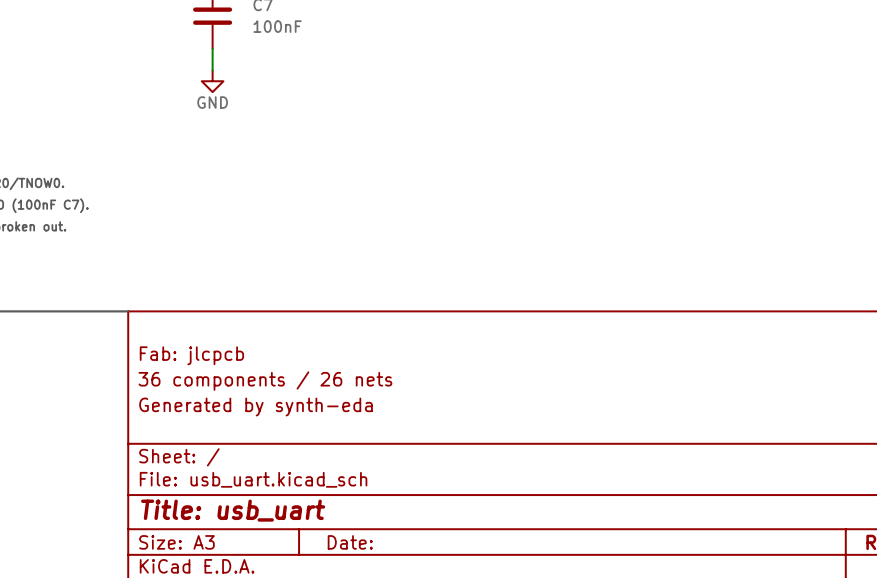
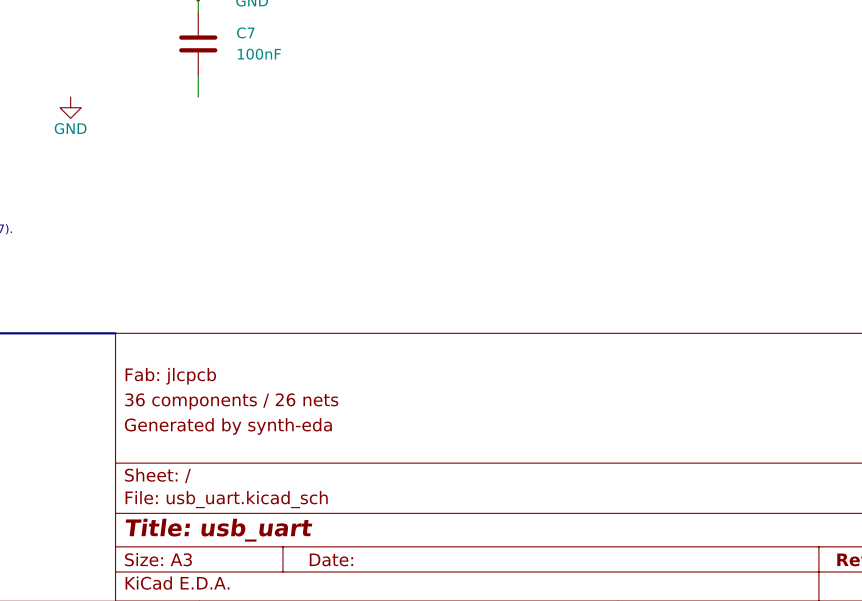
power symbol position: GND (212, 81) -> GND (70, 107)

